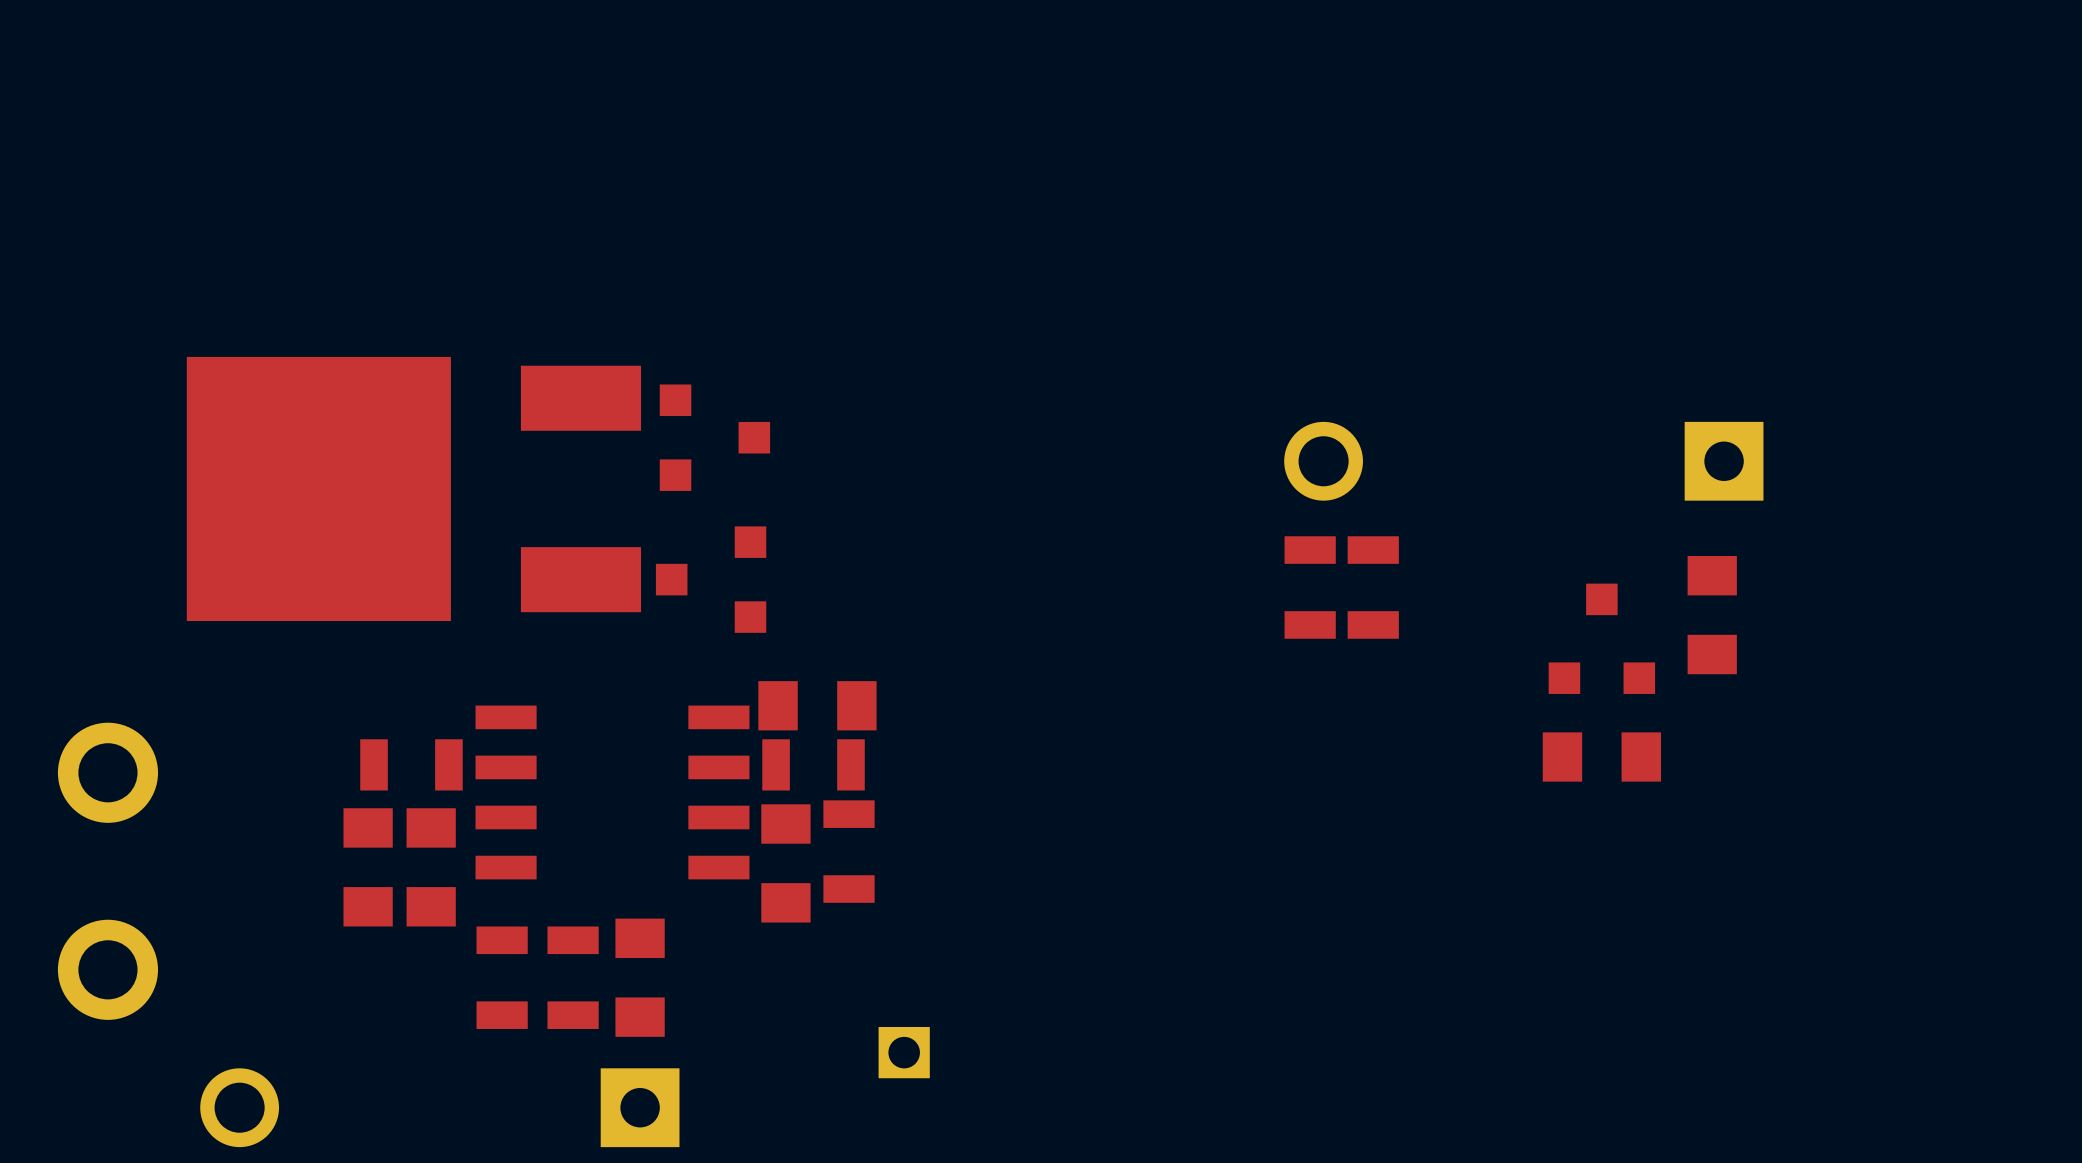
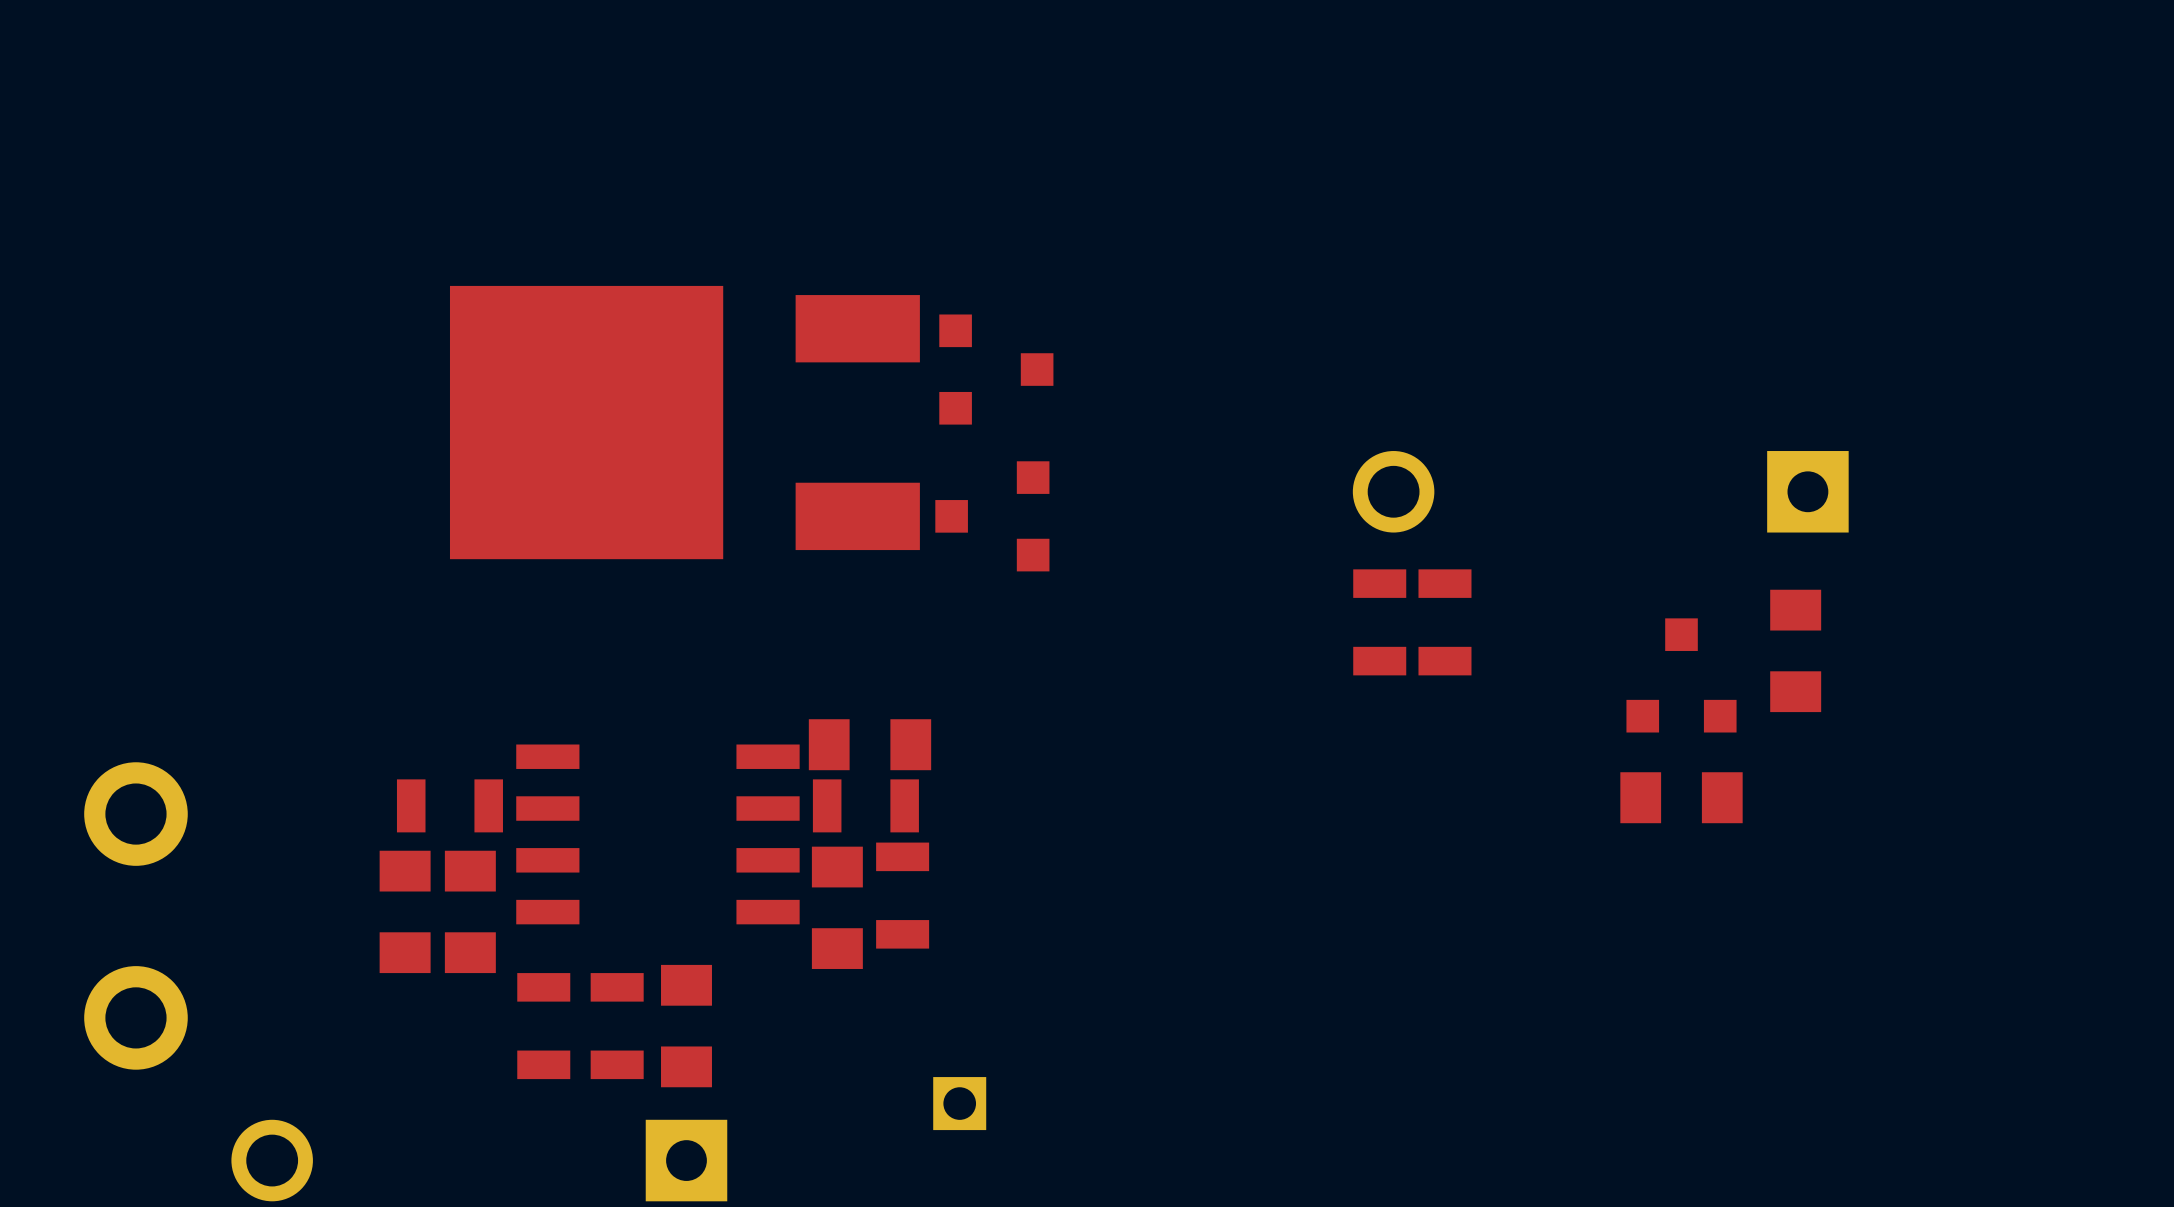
part: none -> (996, 369)
part: (714, 437) -> none
part: none -> (992, 516)
part position: (413, 488) -> (684, 422)
part: (711, 579) -> none

